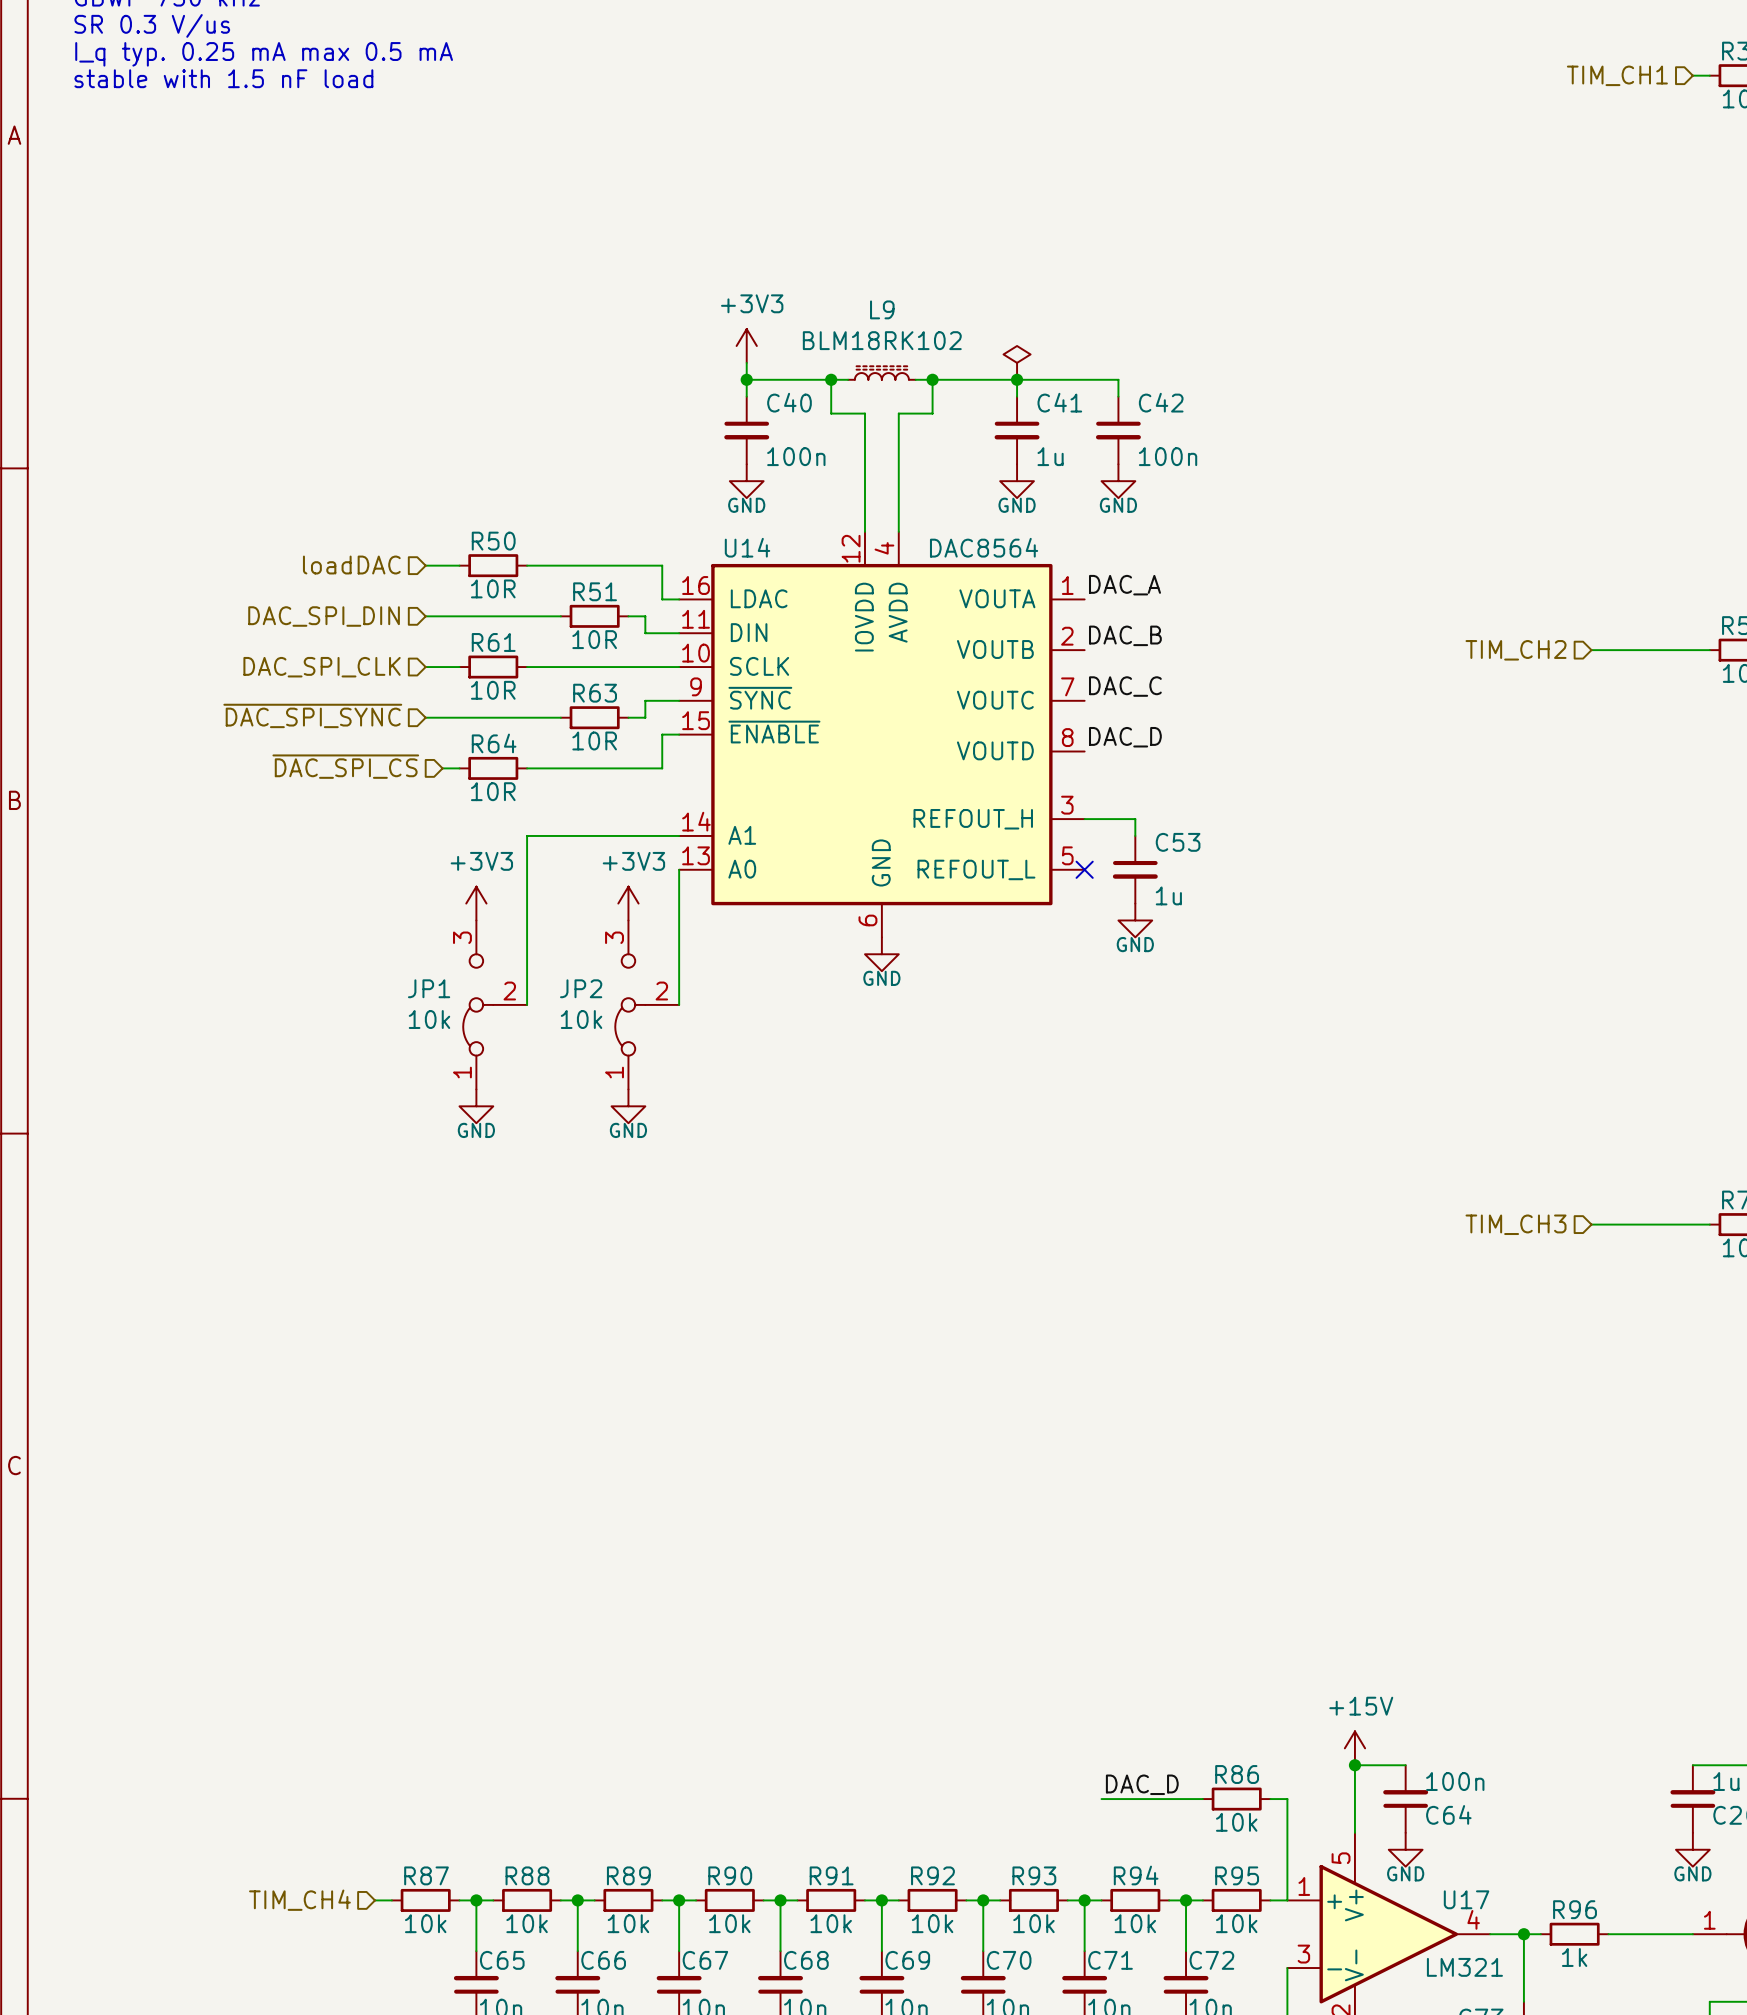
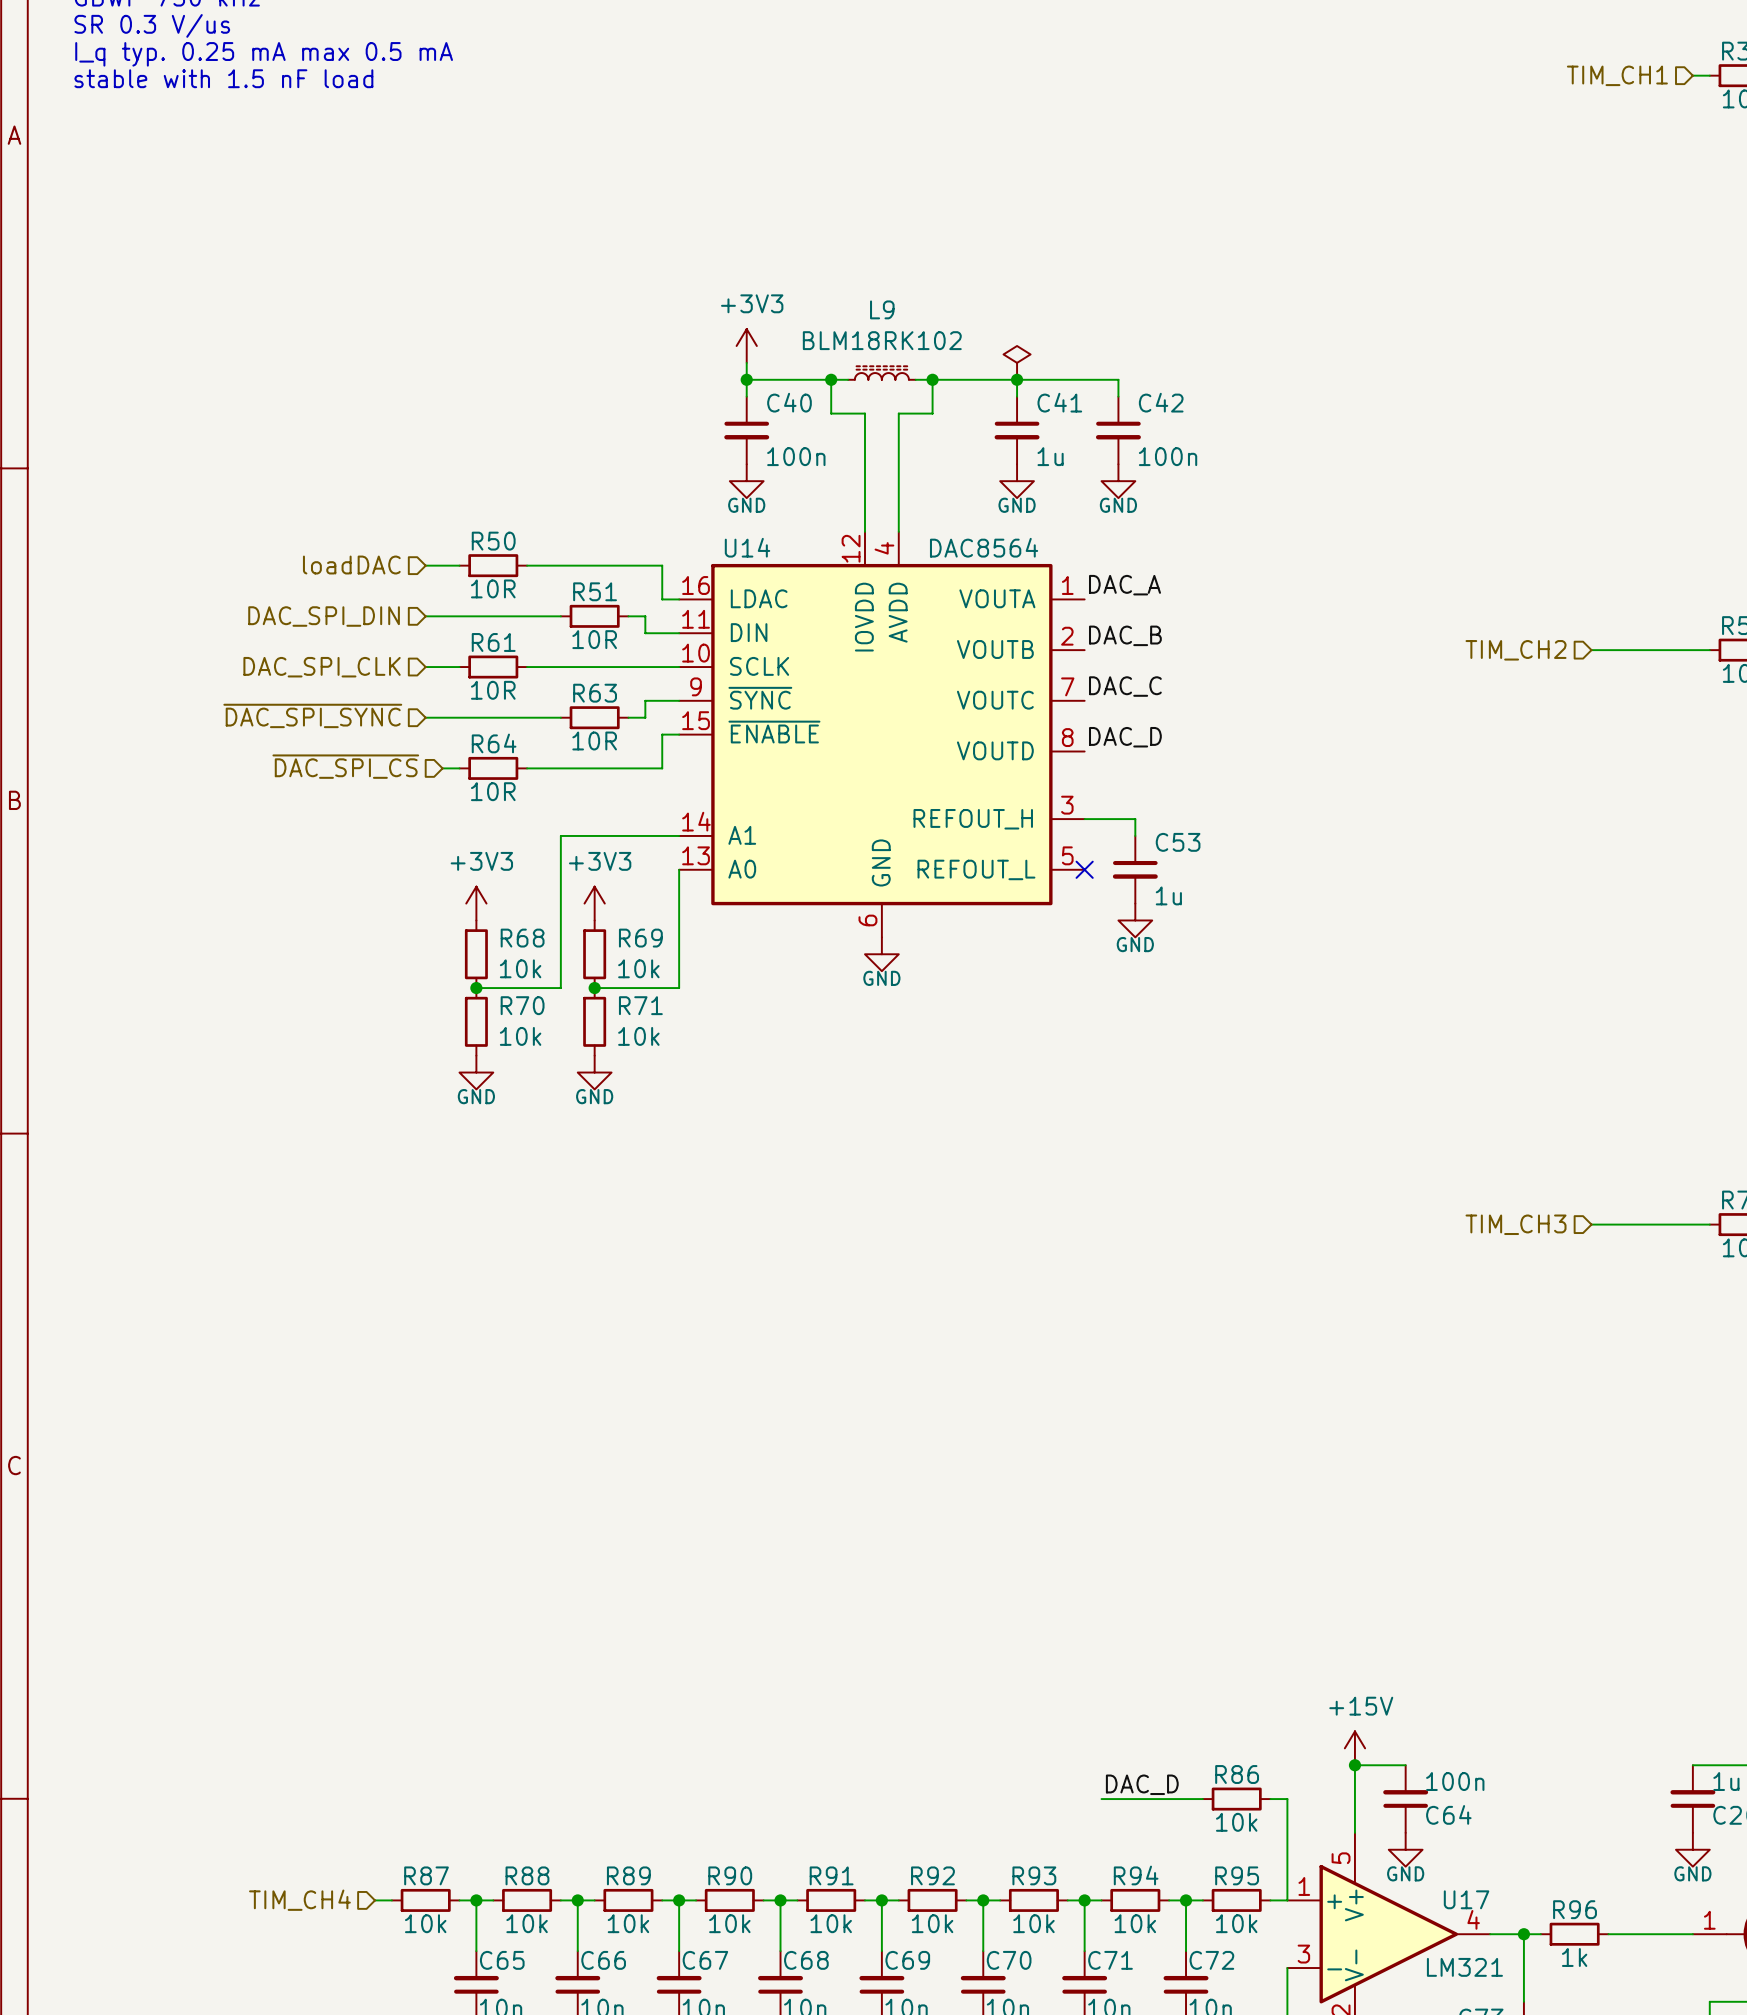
wire: (560, 835) (527, 835) (527, 1004) -> (560, 835) (560, 988) (476, 988)
power symbol position: +3V3 (628, 903) -> +3V3 (594, 903)
R68: none -> 10k (476, 954)
R69: none -> 10k (594, 954)
junction: none -> (476, 988)
junction: none -> (594, 988)
wire: (679, 988) (679, 1004) -> (679, 988) (594, 988)
JP1: 10k (495, 1004) -> none
JP2: 10k (647, 1004) -> none
R70: none -> 10k (476, 1021)
R71: none -> 10k (594, 1021)
power symbol position: GND (476, 1106) -> GND (476, 1072)
power symbol position: GND (628, 1106) -> GND (594, 1072)

